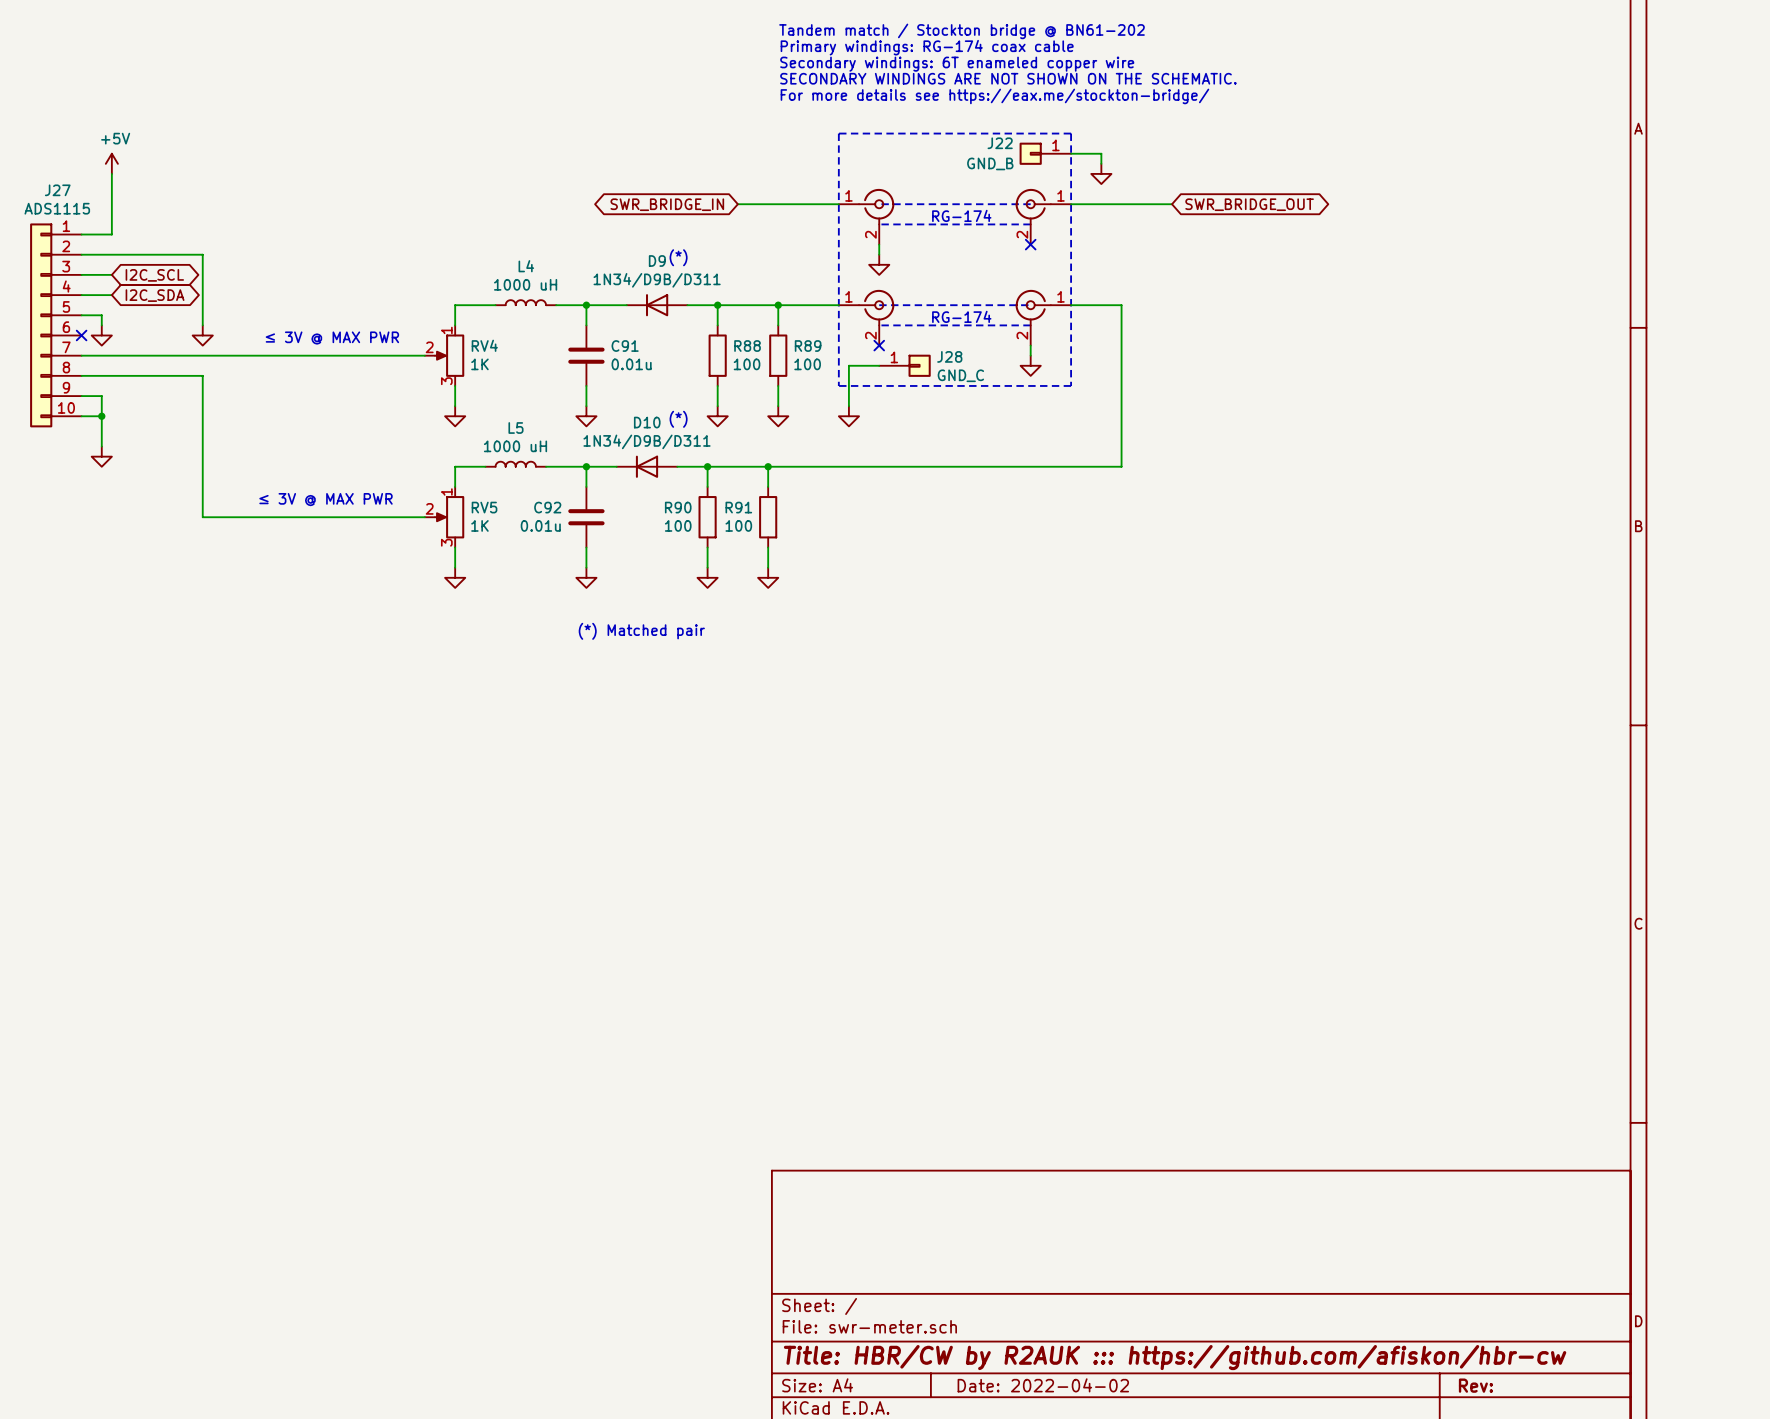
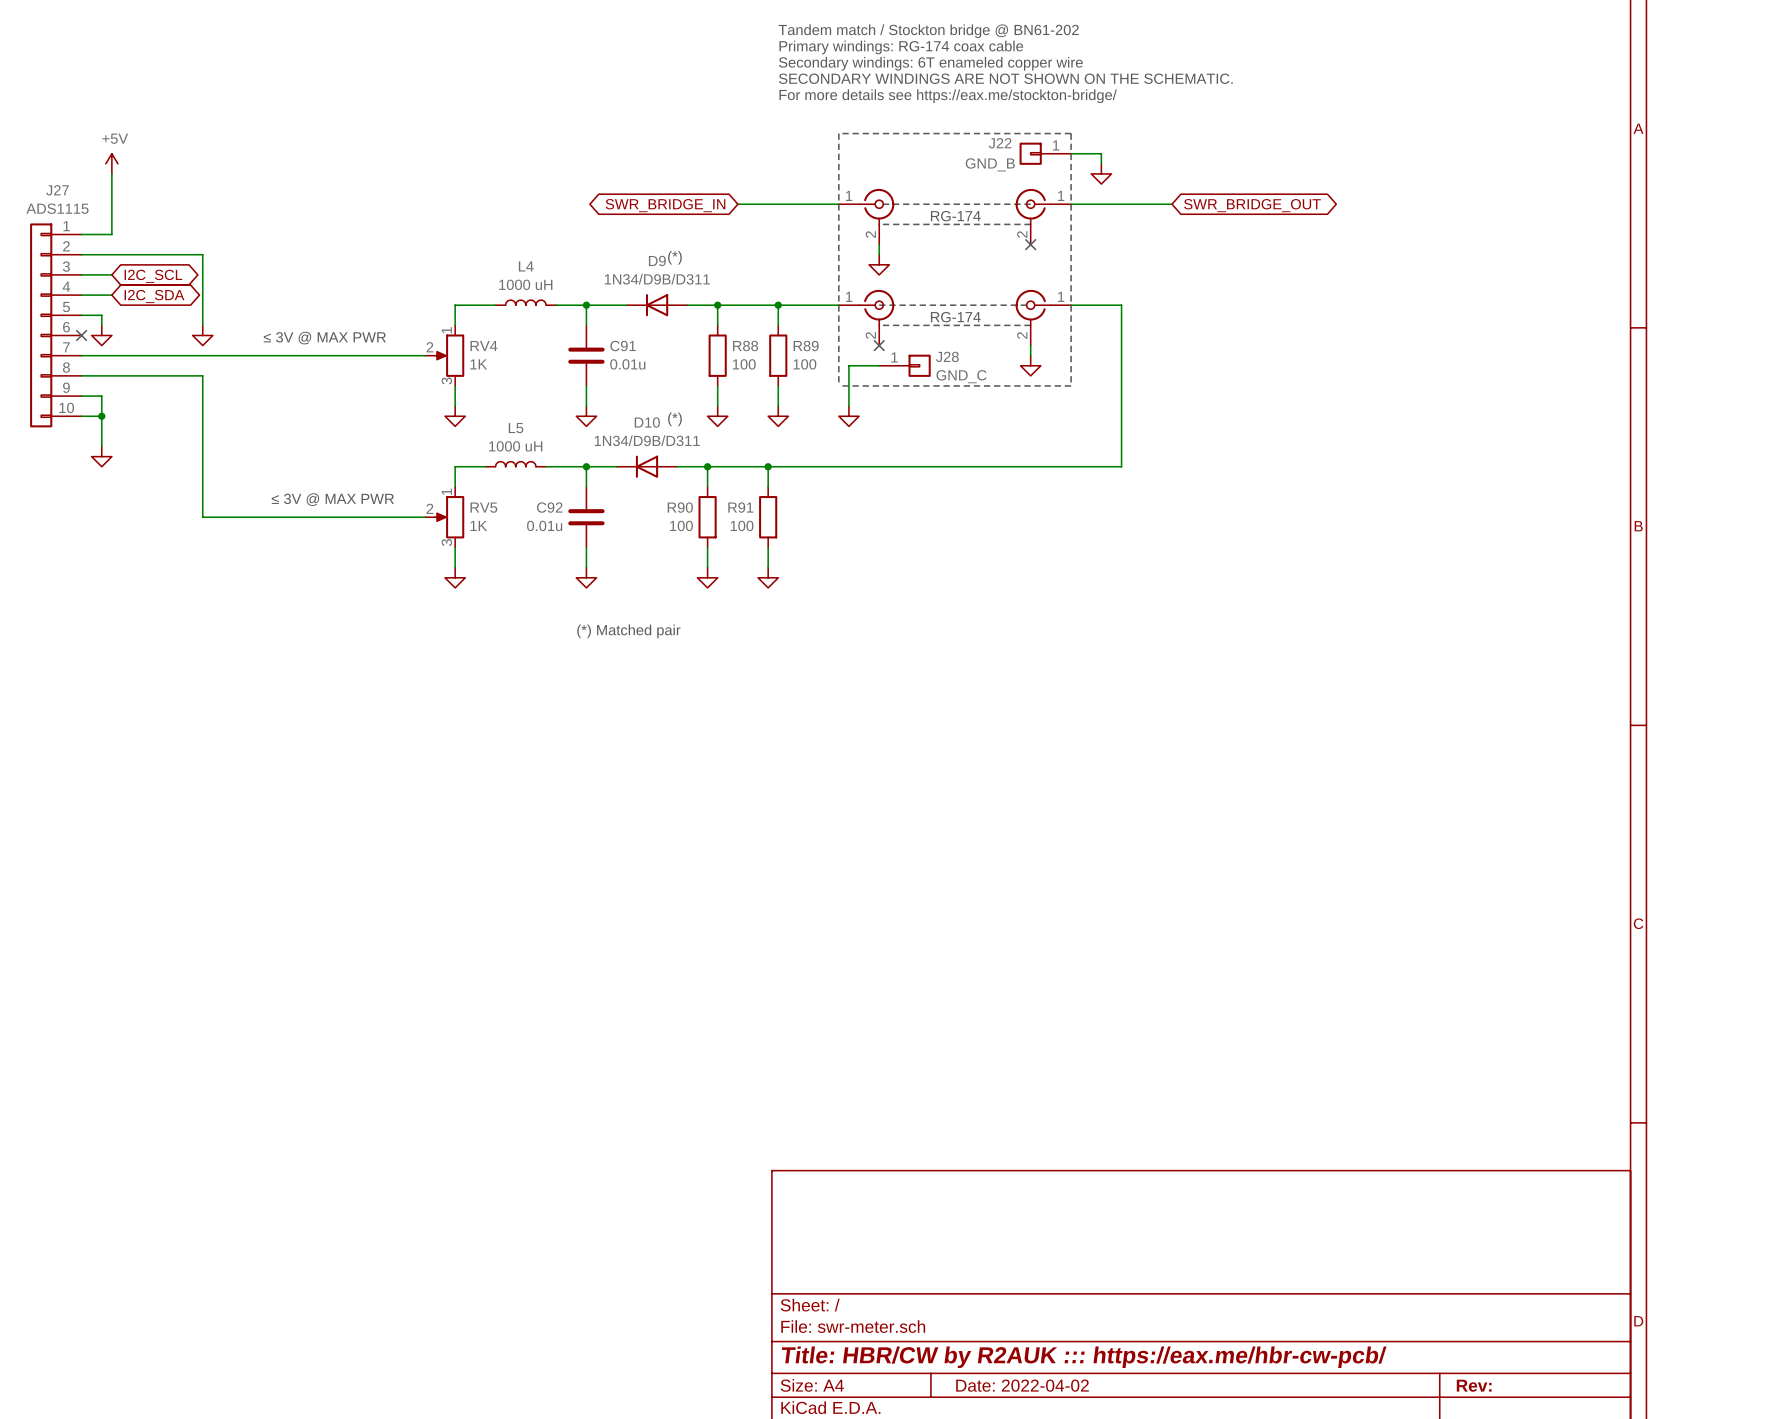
title block: Title: HBR/CW by R2AUK ::: https://github.com/afiskon/hbr-cw (1175, 1357) -> Title: HBR/CW by R2AUK ::: https://eax.me/hbr-cw-pcb/ (1084, 1357)

